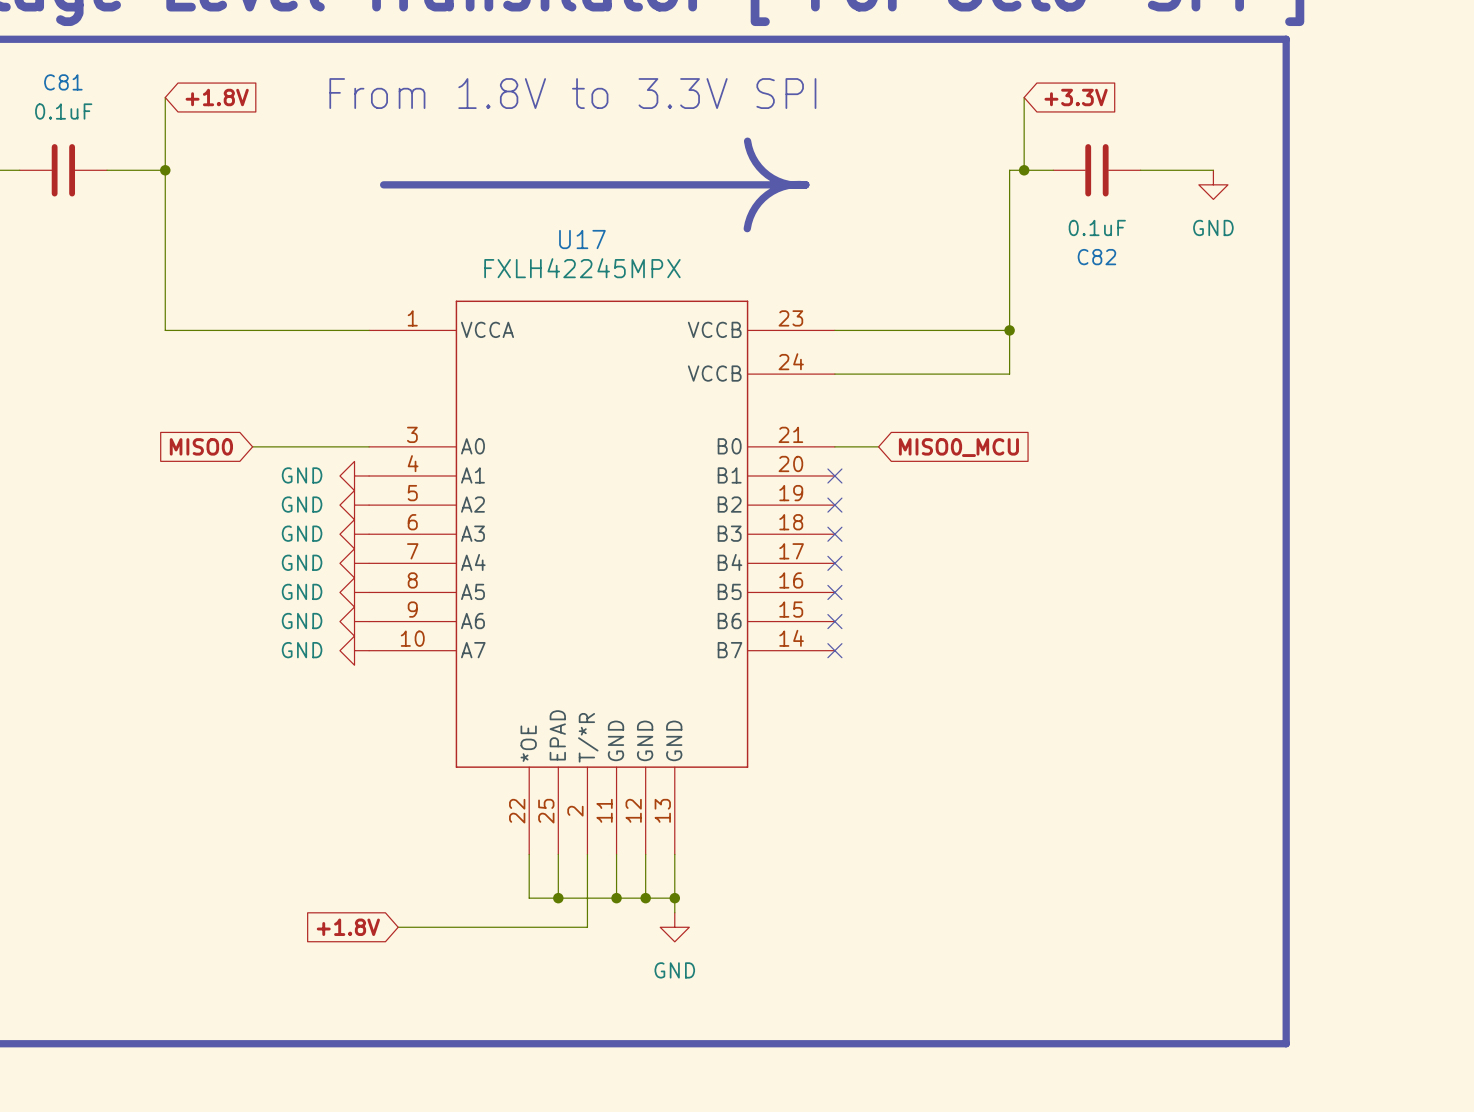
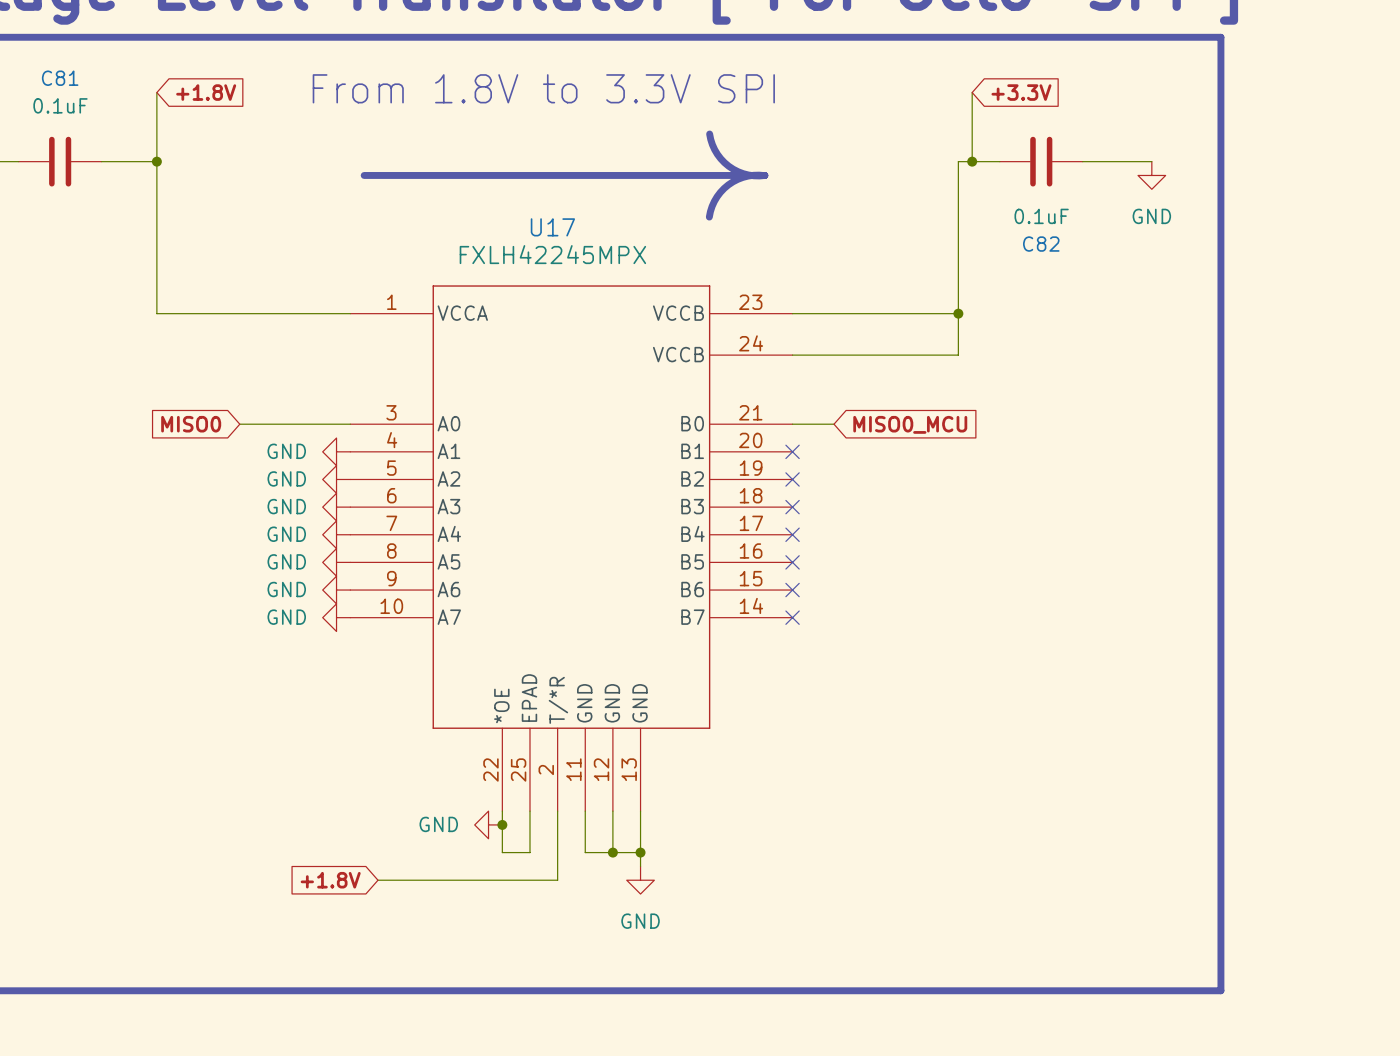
power symbol: none -> GND (488, 824)
wire: (558, 898) (616, 898) -> none
junction position: (558, 898) -> (502, 824)
junction: (616, 898) -> none

